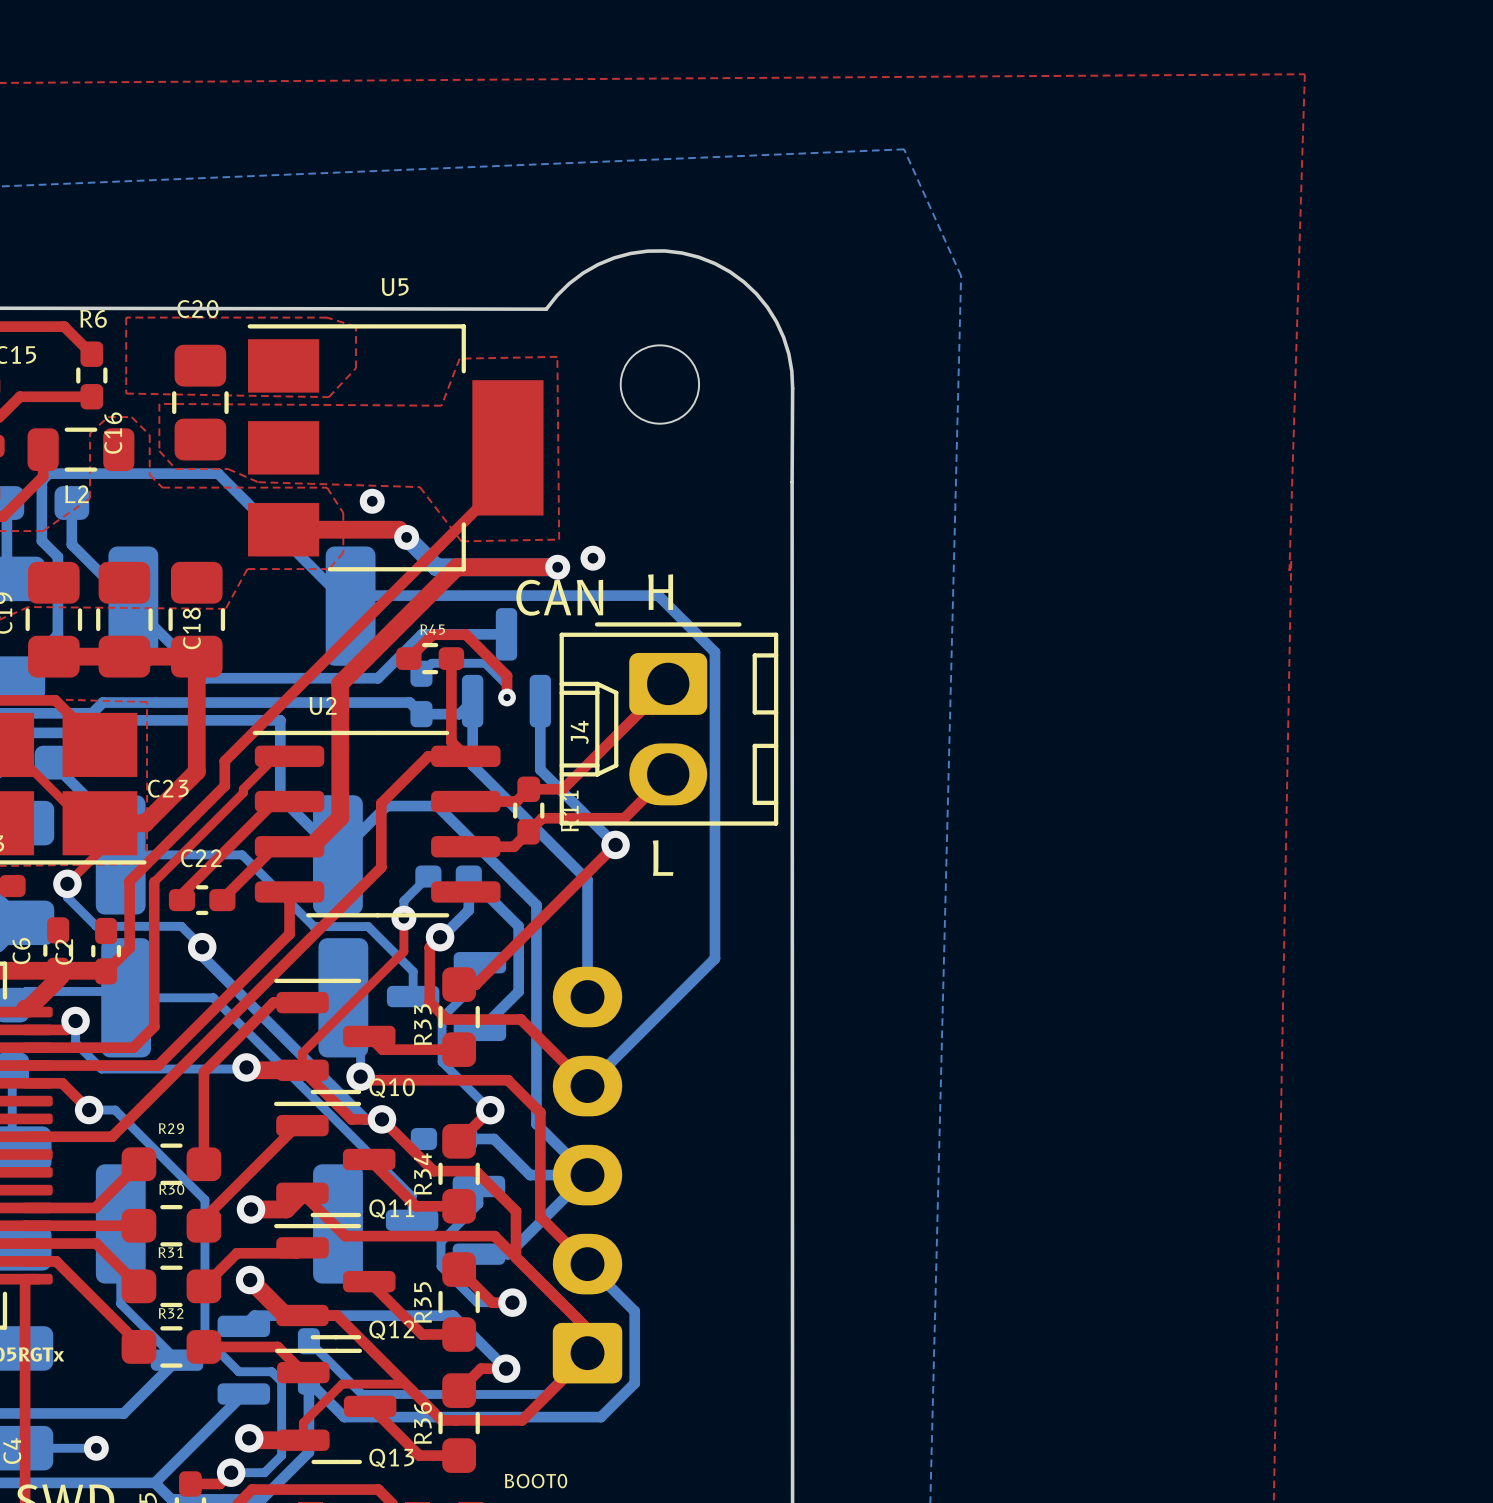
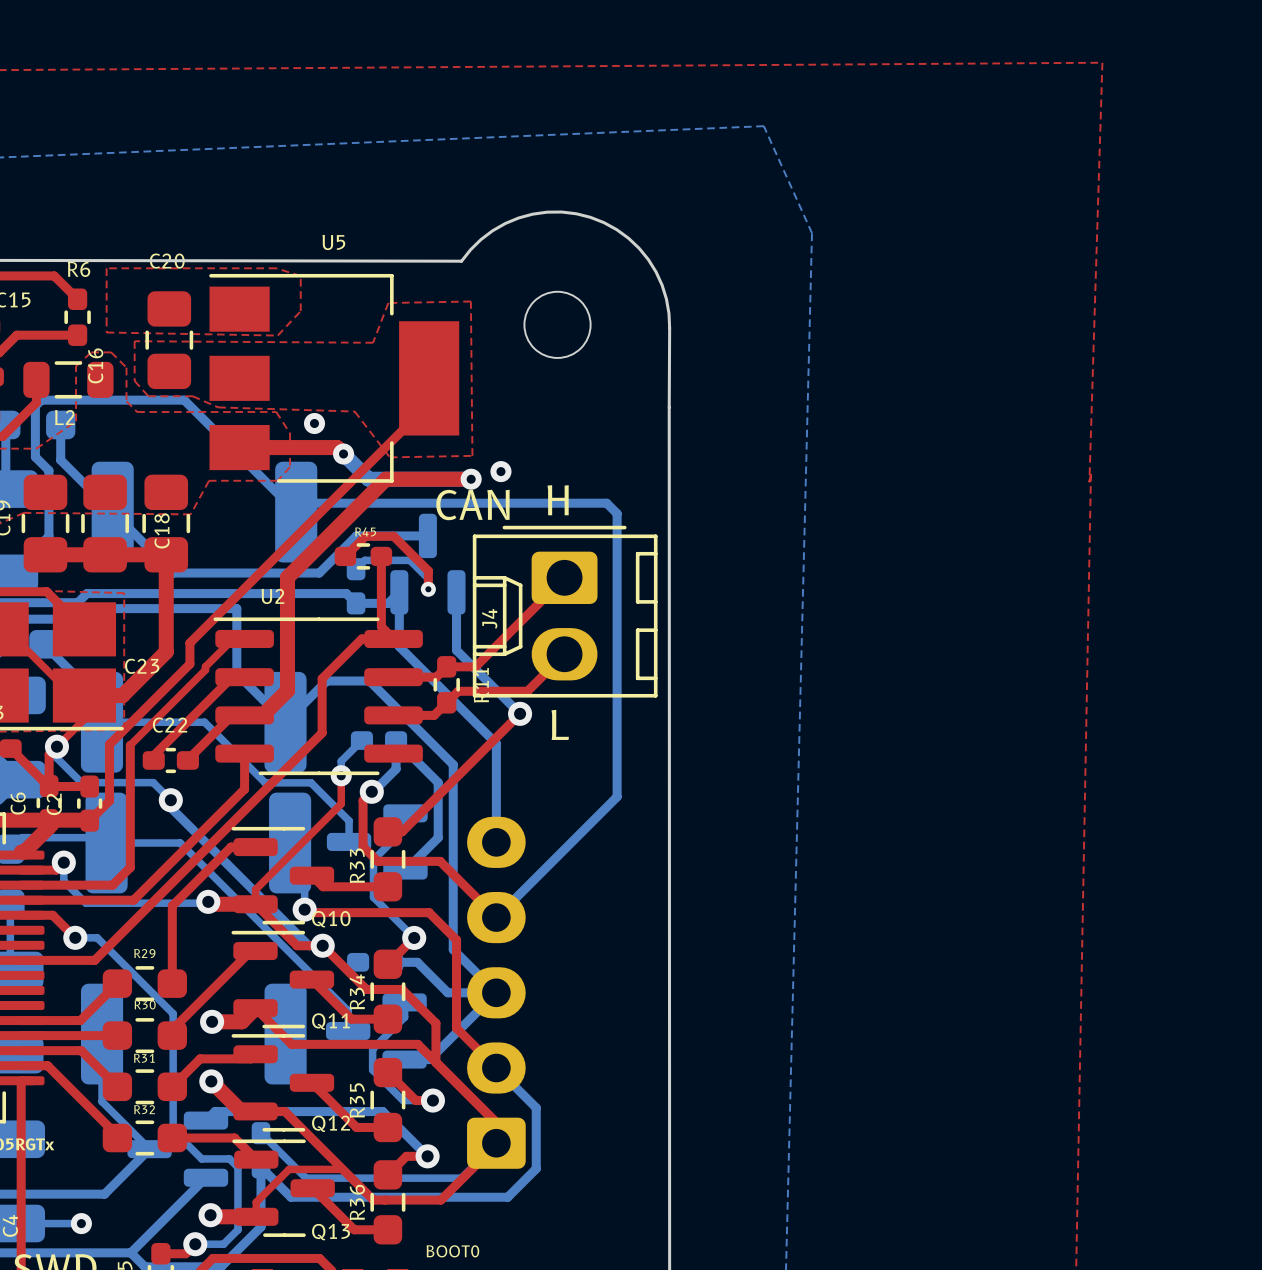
bottom track: (658, 595) (714, 652) (714, 958) -> (556, 503) (606, 503) (617, 513) (617, 796) (604, 809)
top track: none -> (56, 746) (49, 754) (49, 786)
top track: none -> (10, 748) (49, 786)
top track: none -> (49, 786) (89, 786)

